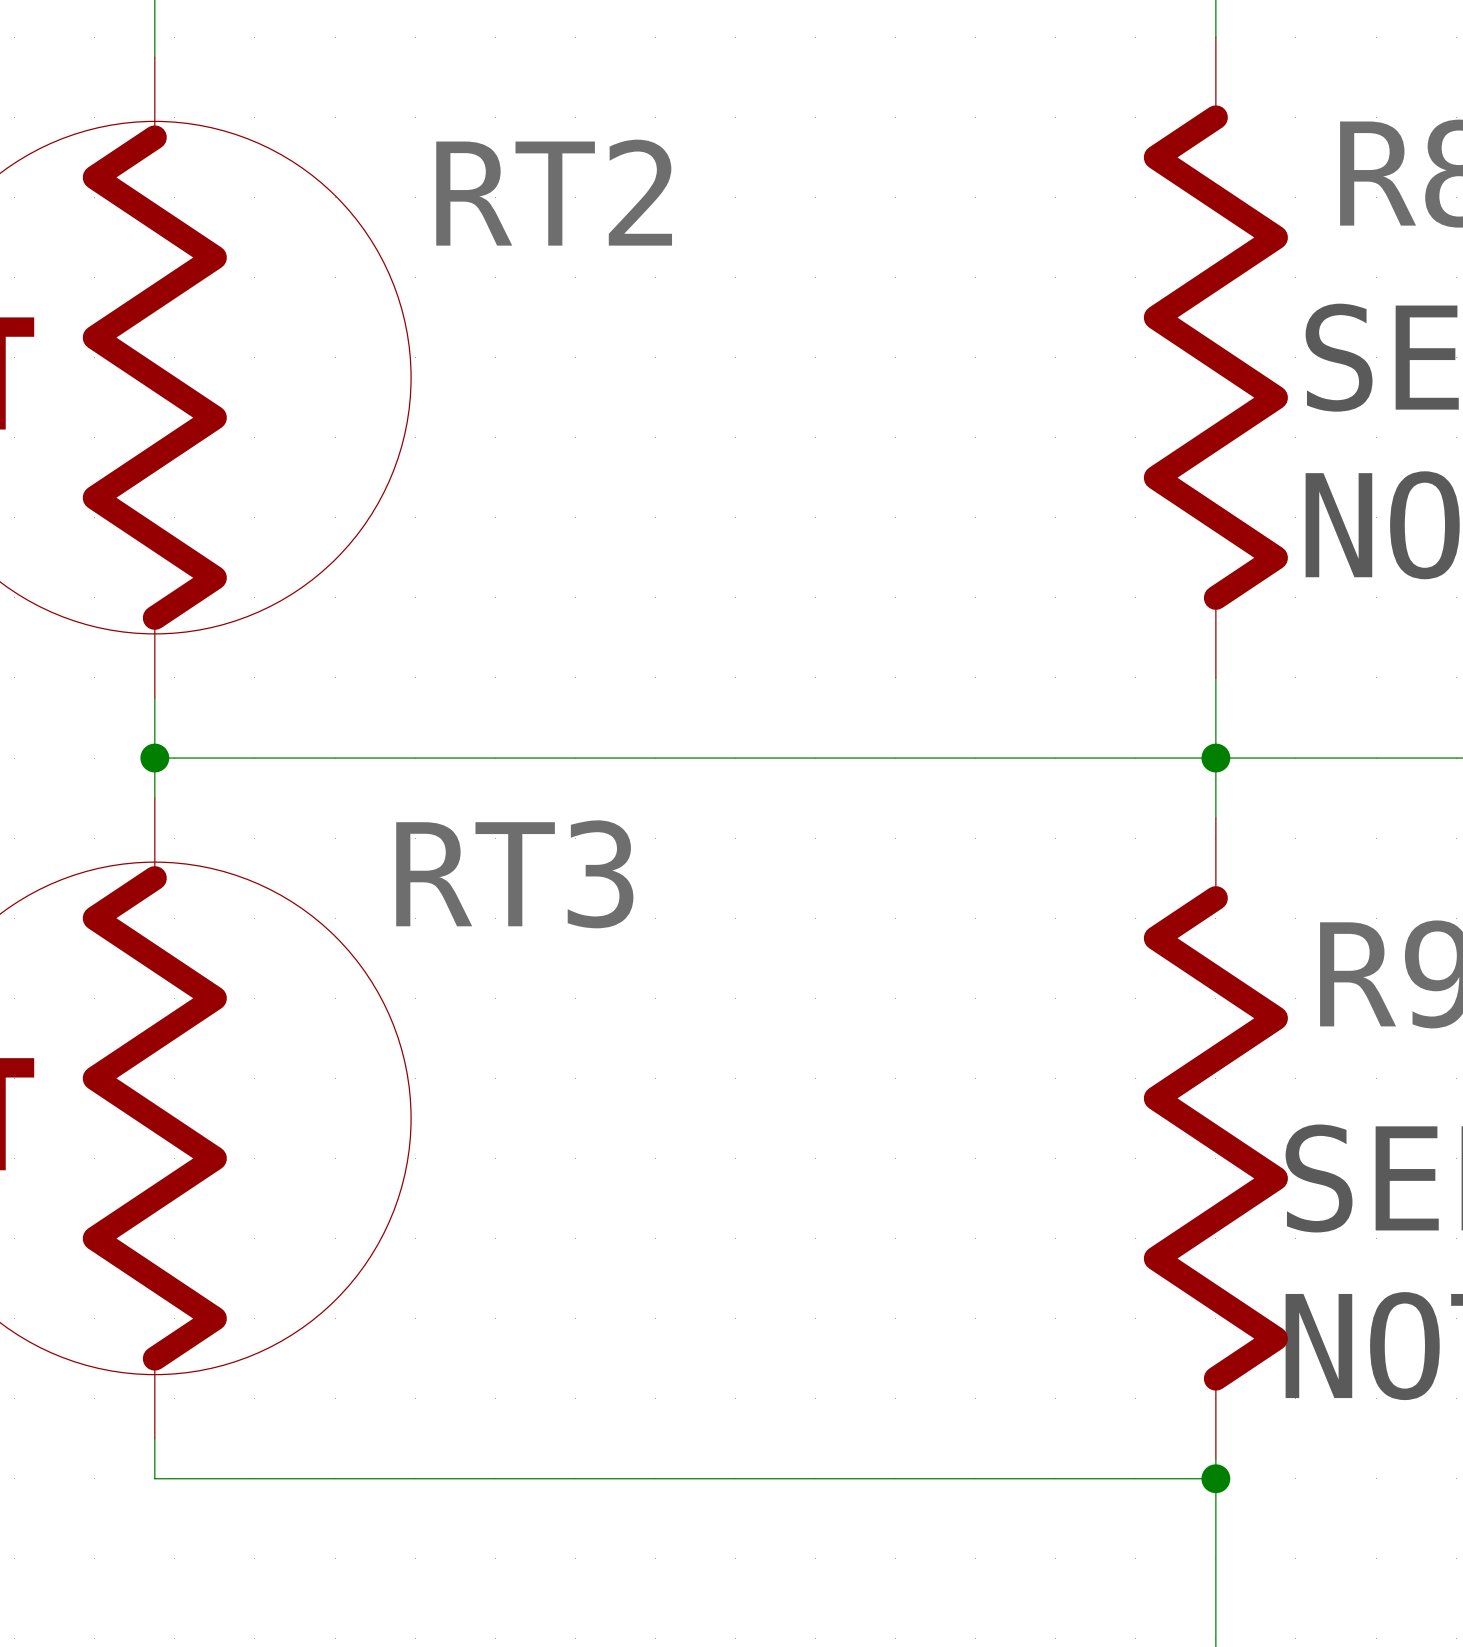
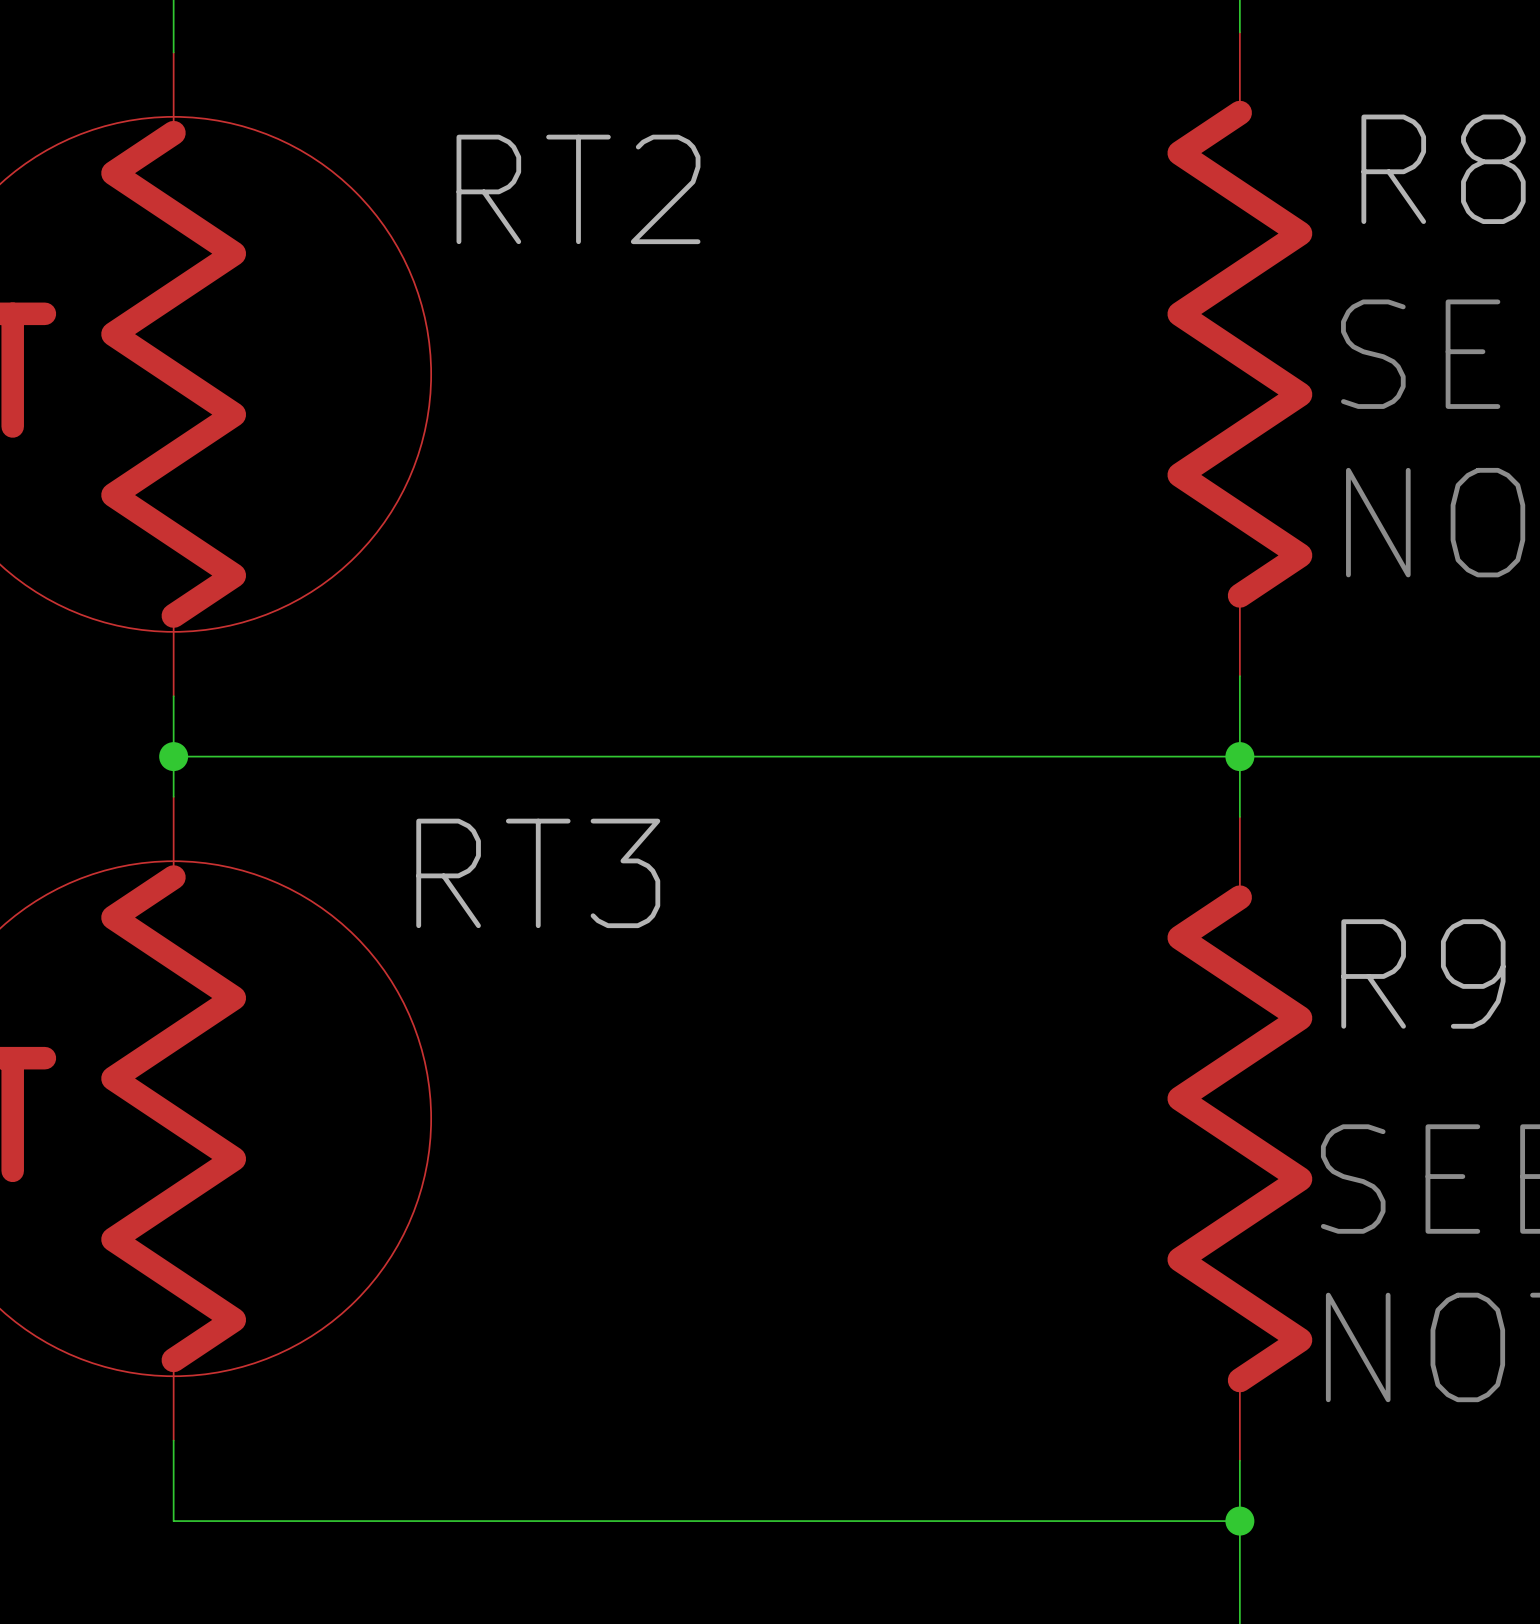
wire: (154, 1478) (1215, 1478) -> (173, 1480) (173, 1521) (1239, 1521)
junction position: (1215, 1478) -> (1239, 1521)

